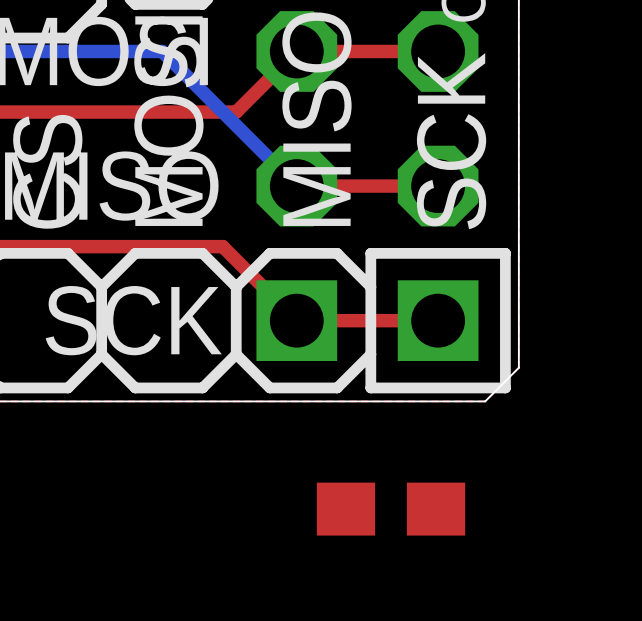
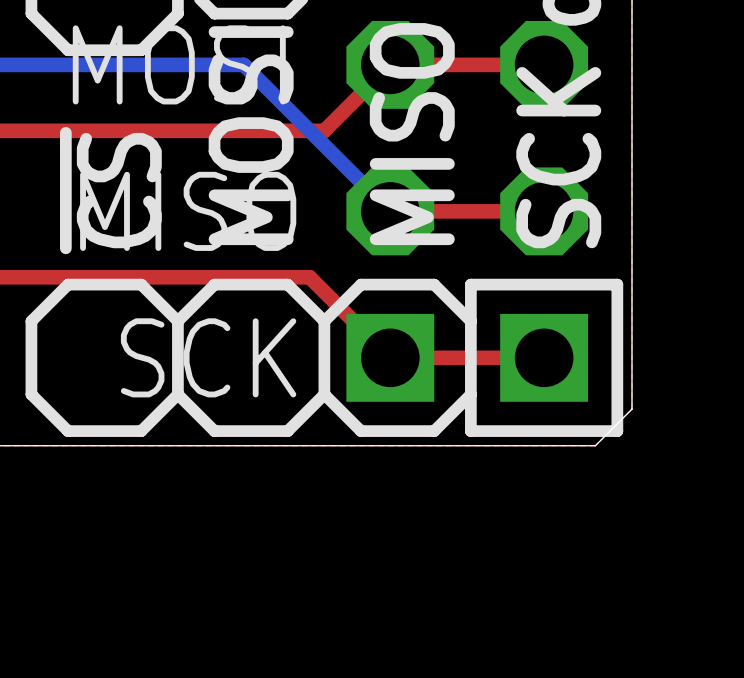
part: (391, 509) -> none

